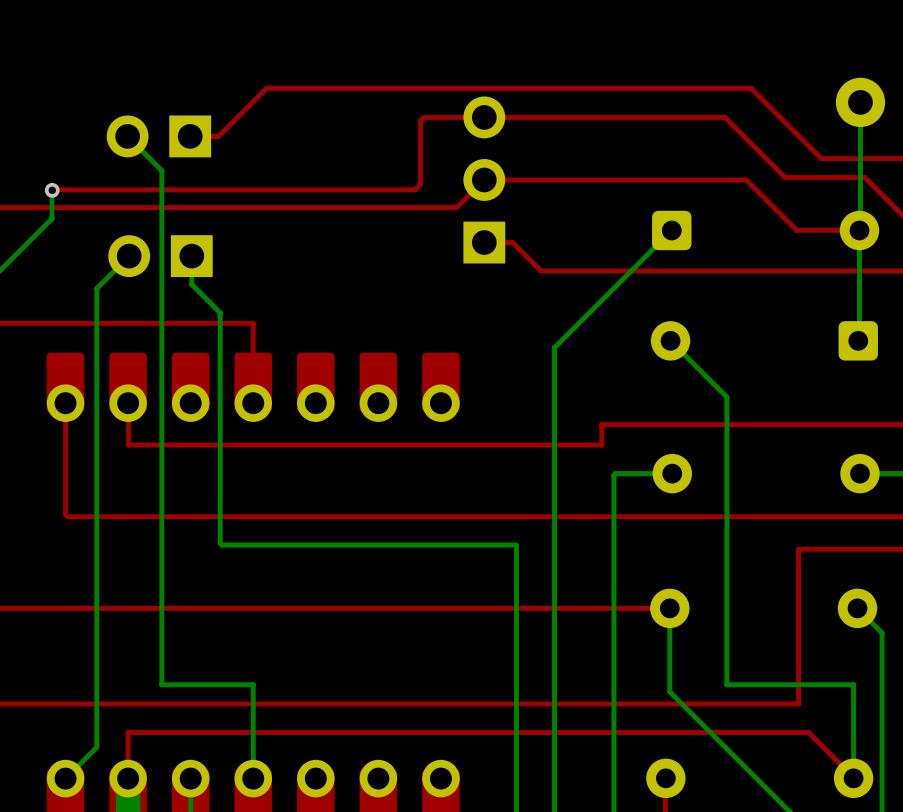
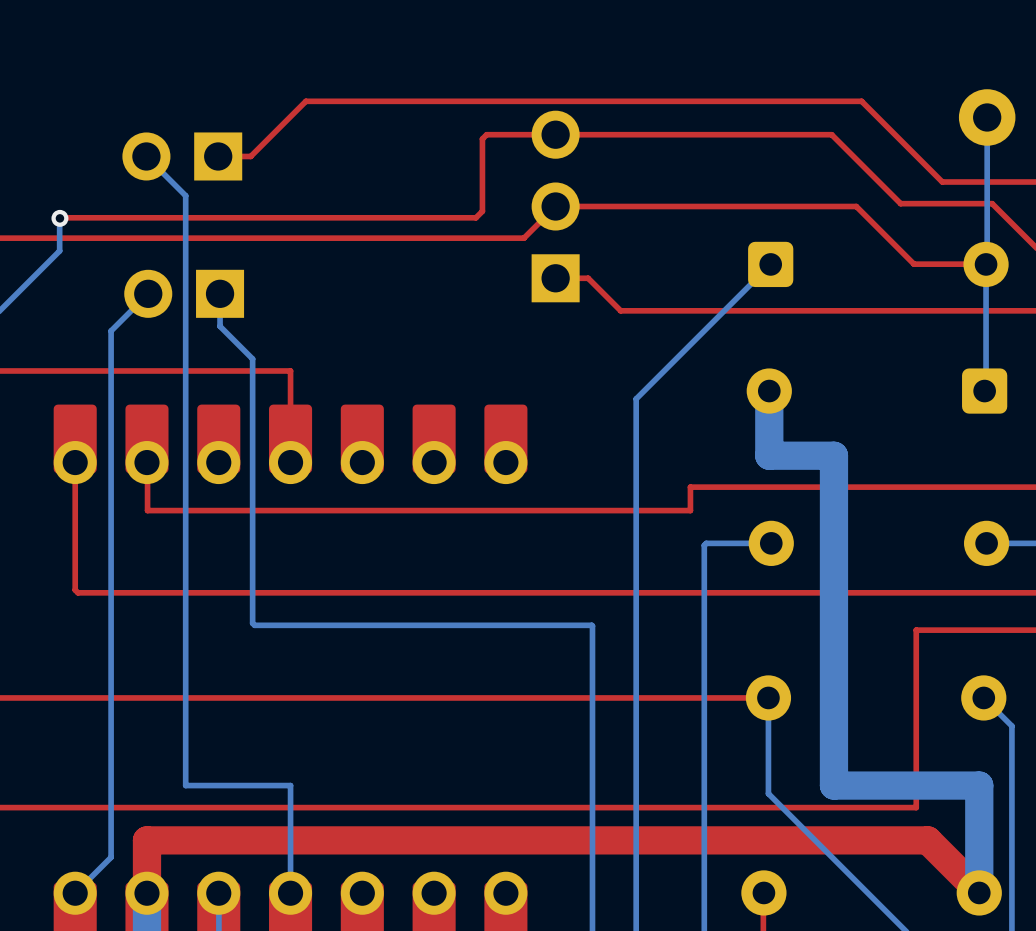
bottom track: (670, 340) (726, 397) -> (769, 391) (769, 455) (833, 455)
bottom track width: thin (726, 397) (726, 684) (853, 684) (853, 778) -> thick (833, 455) (833, 785) (979, 785) (979, 892)
top track width: thin (854, 777) (808, 732) (128, 732) (128, 778) -> thick (979, 892) (927, 840) (146, 840) (146, 893)

